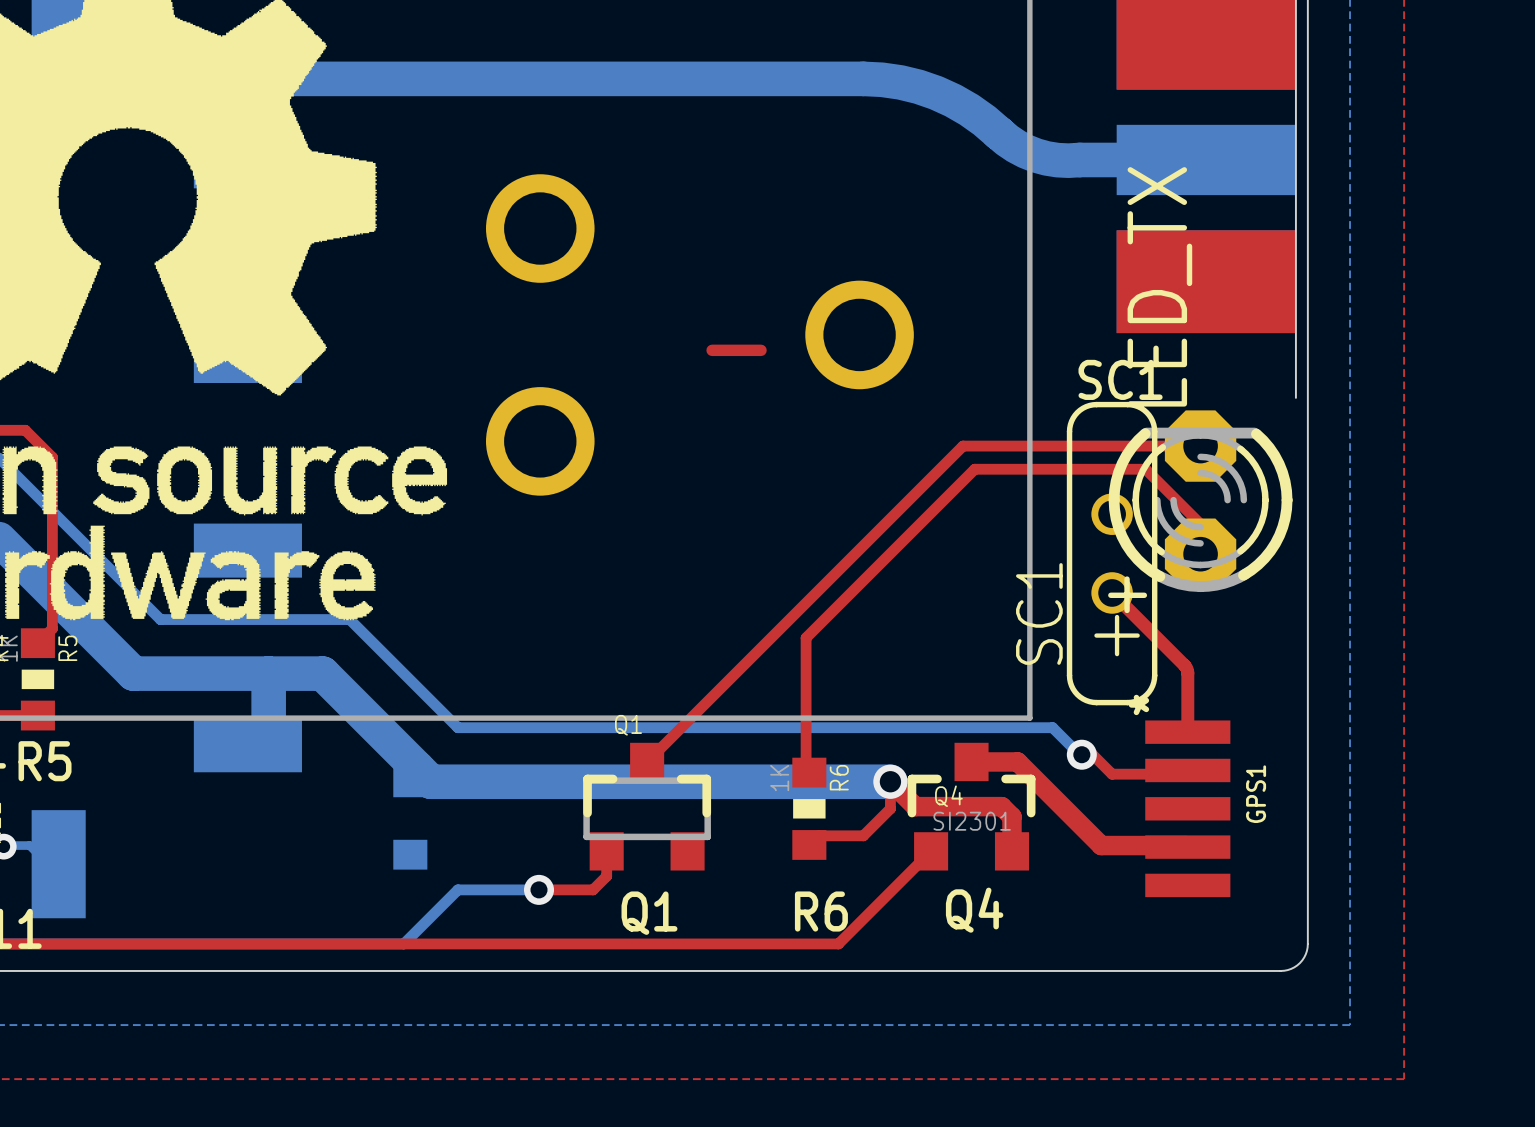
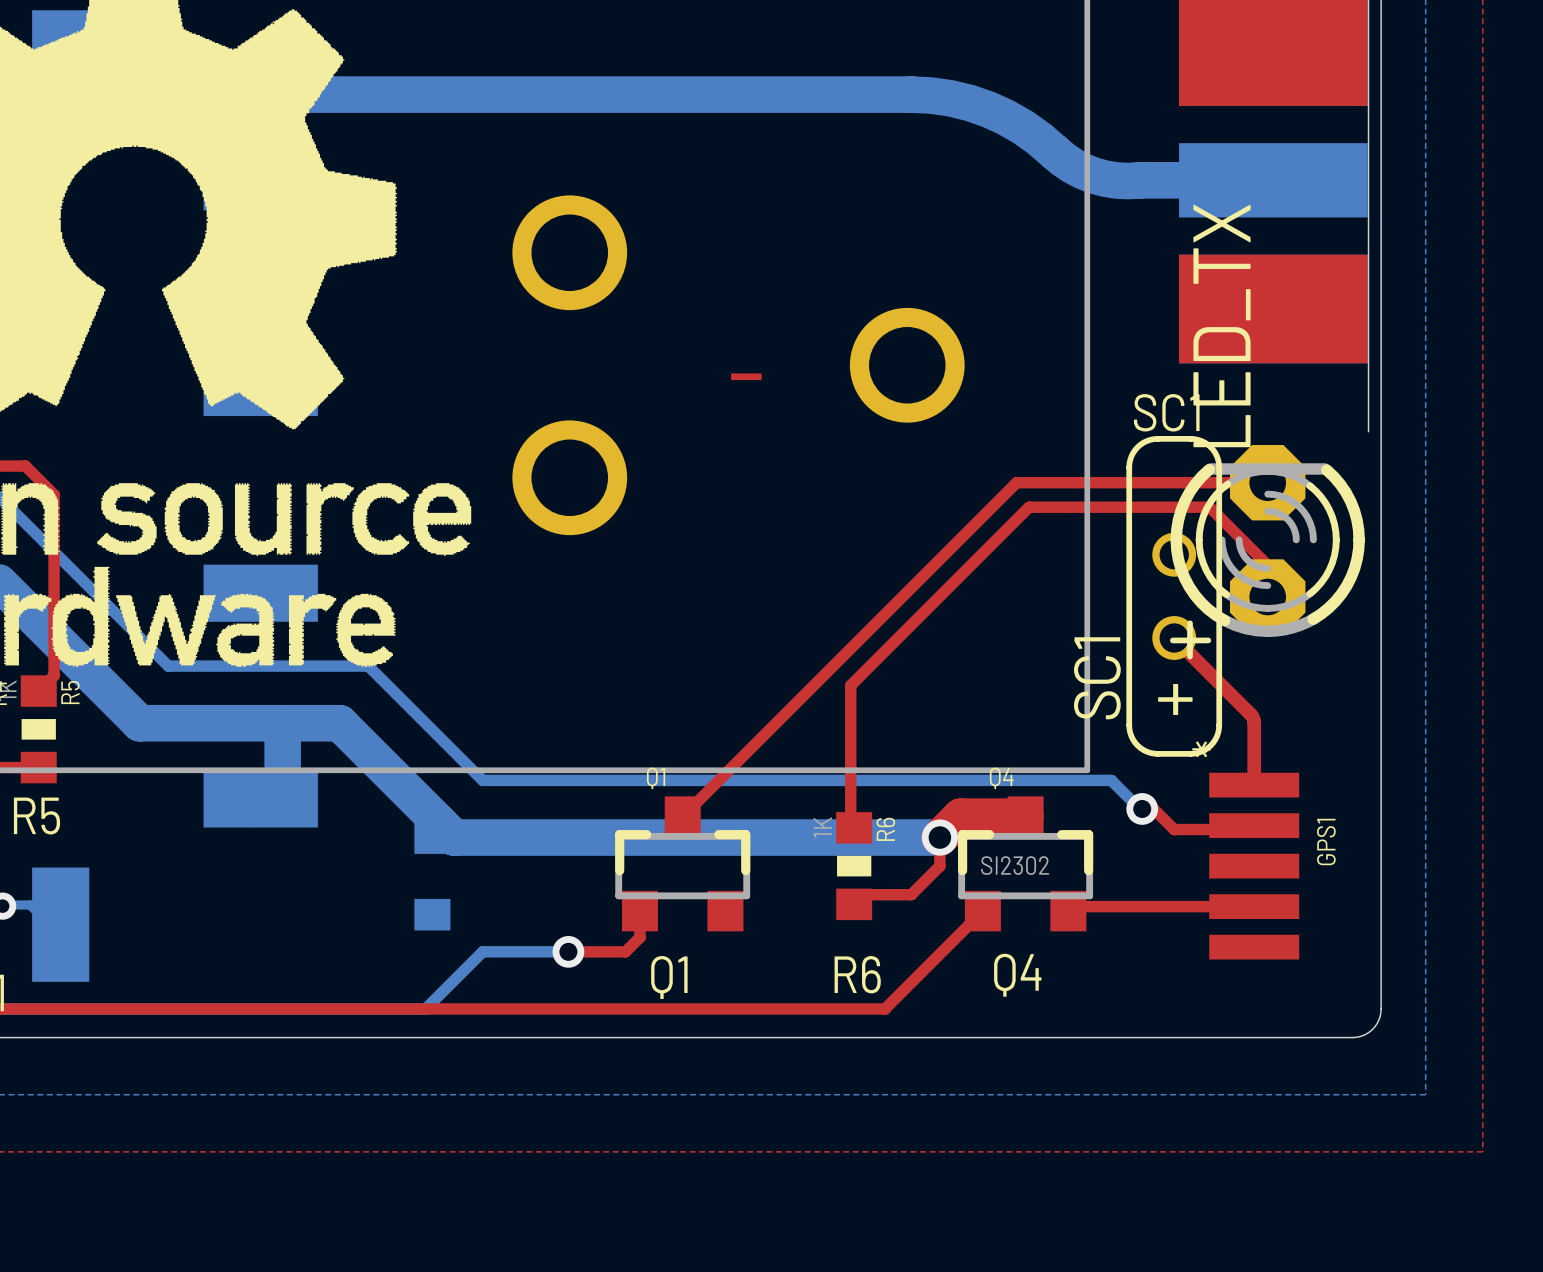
Q4 footprint: [907, 742, 1036, 871] -> [958, 796, 1094, 932]
top track: (971, 761) (1017, 761) (1101, 845) (1186, 845) (1187, 847) -> (1068, 911) (1072, 906) (1254, 906)
top track: (890, 781) (915, 806) (1001, 806) (1011, 816) (1011, 851) -> (939, 837) (960, 816) (1025, 816)
Q4 value: SI2301 (972, 821) -> SI2302 (1015, 865)

